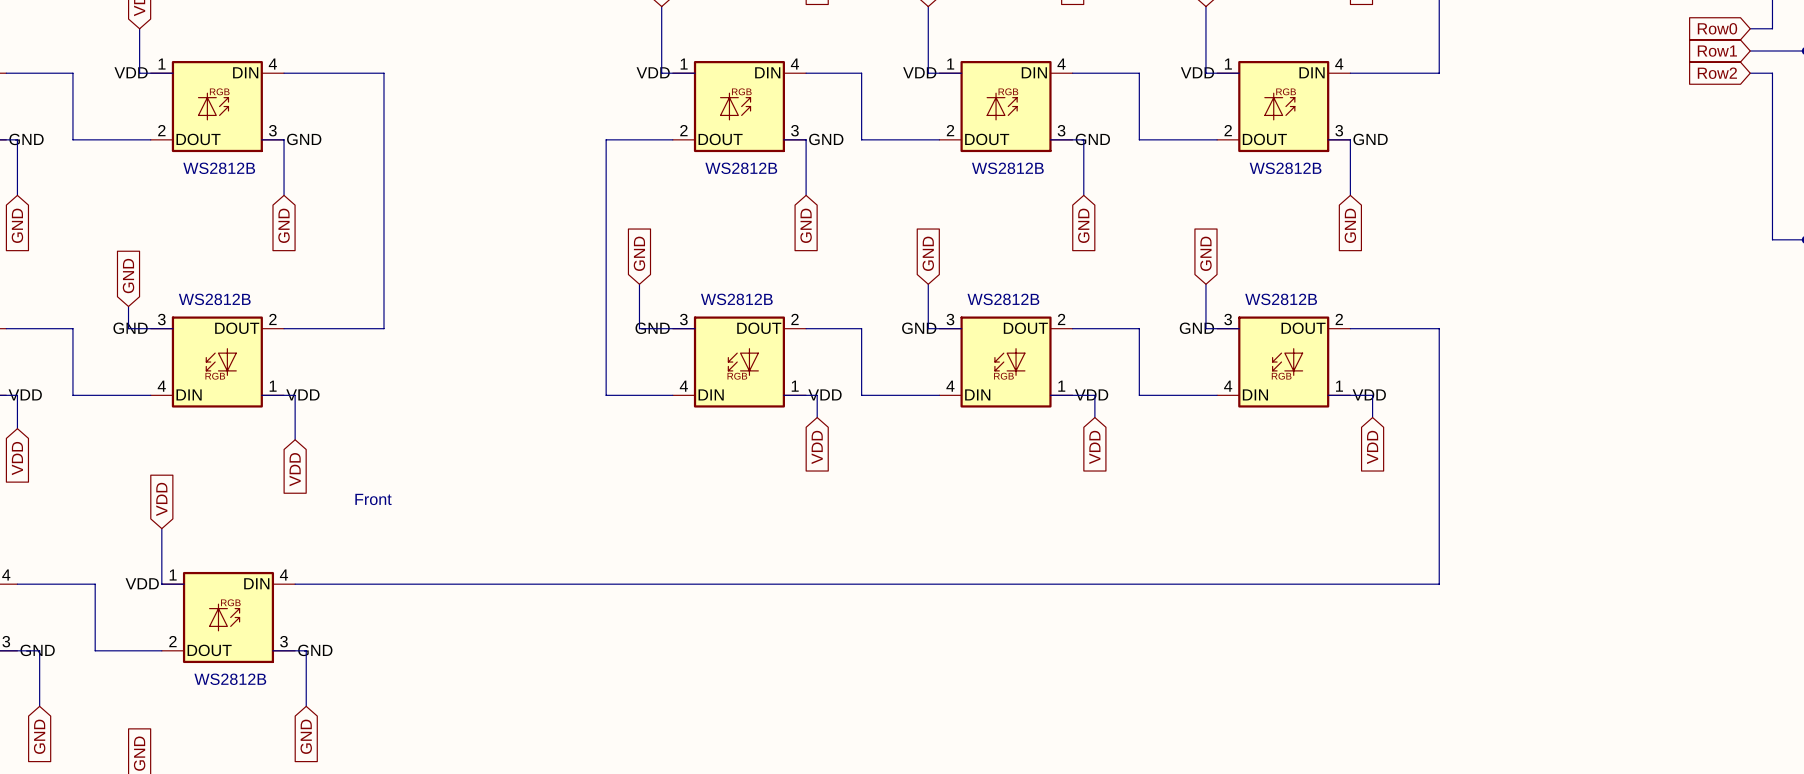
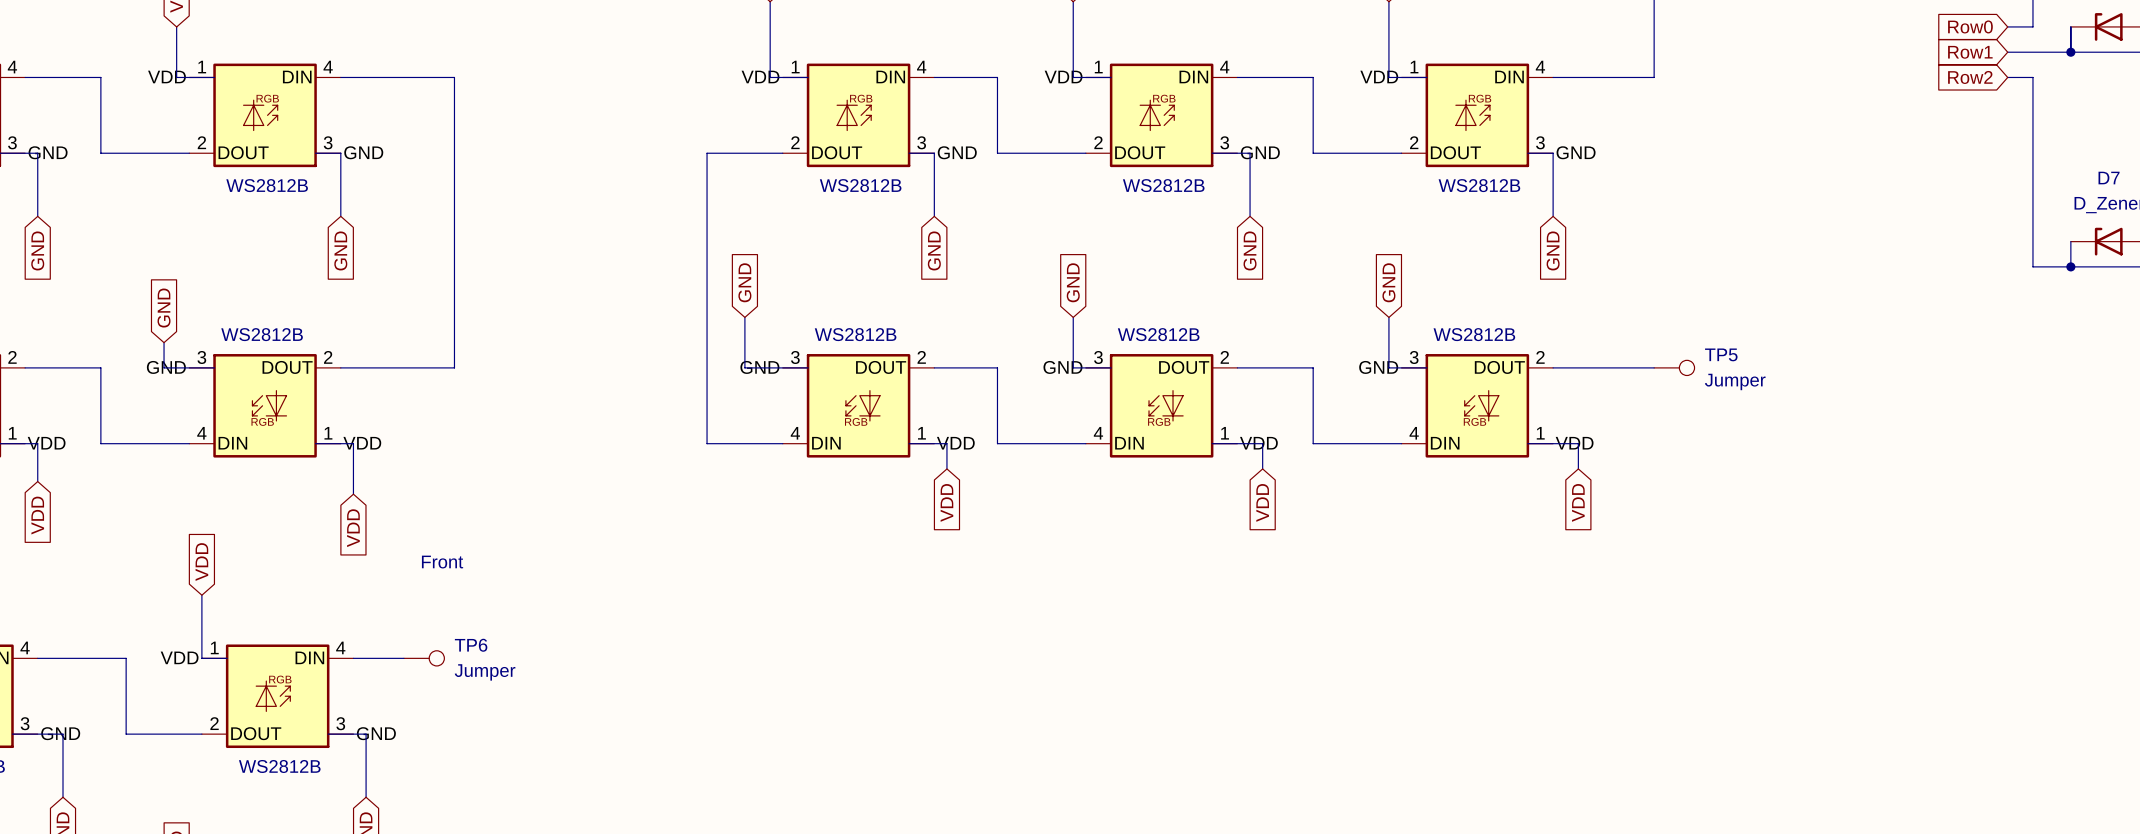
wire: (1439, 328) (1439, 584) (339, 584) -> none
TP5: none -> Jumper (1674, 367)
TP6: none -> Jumper (424, 658)

